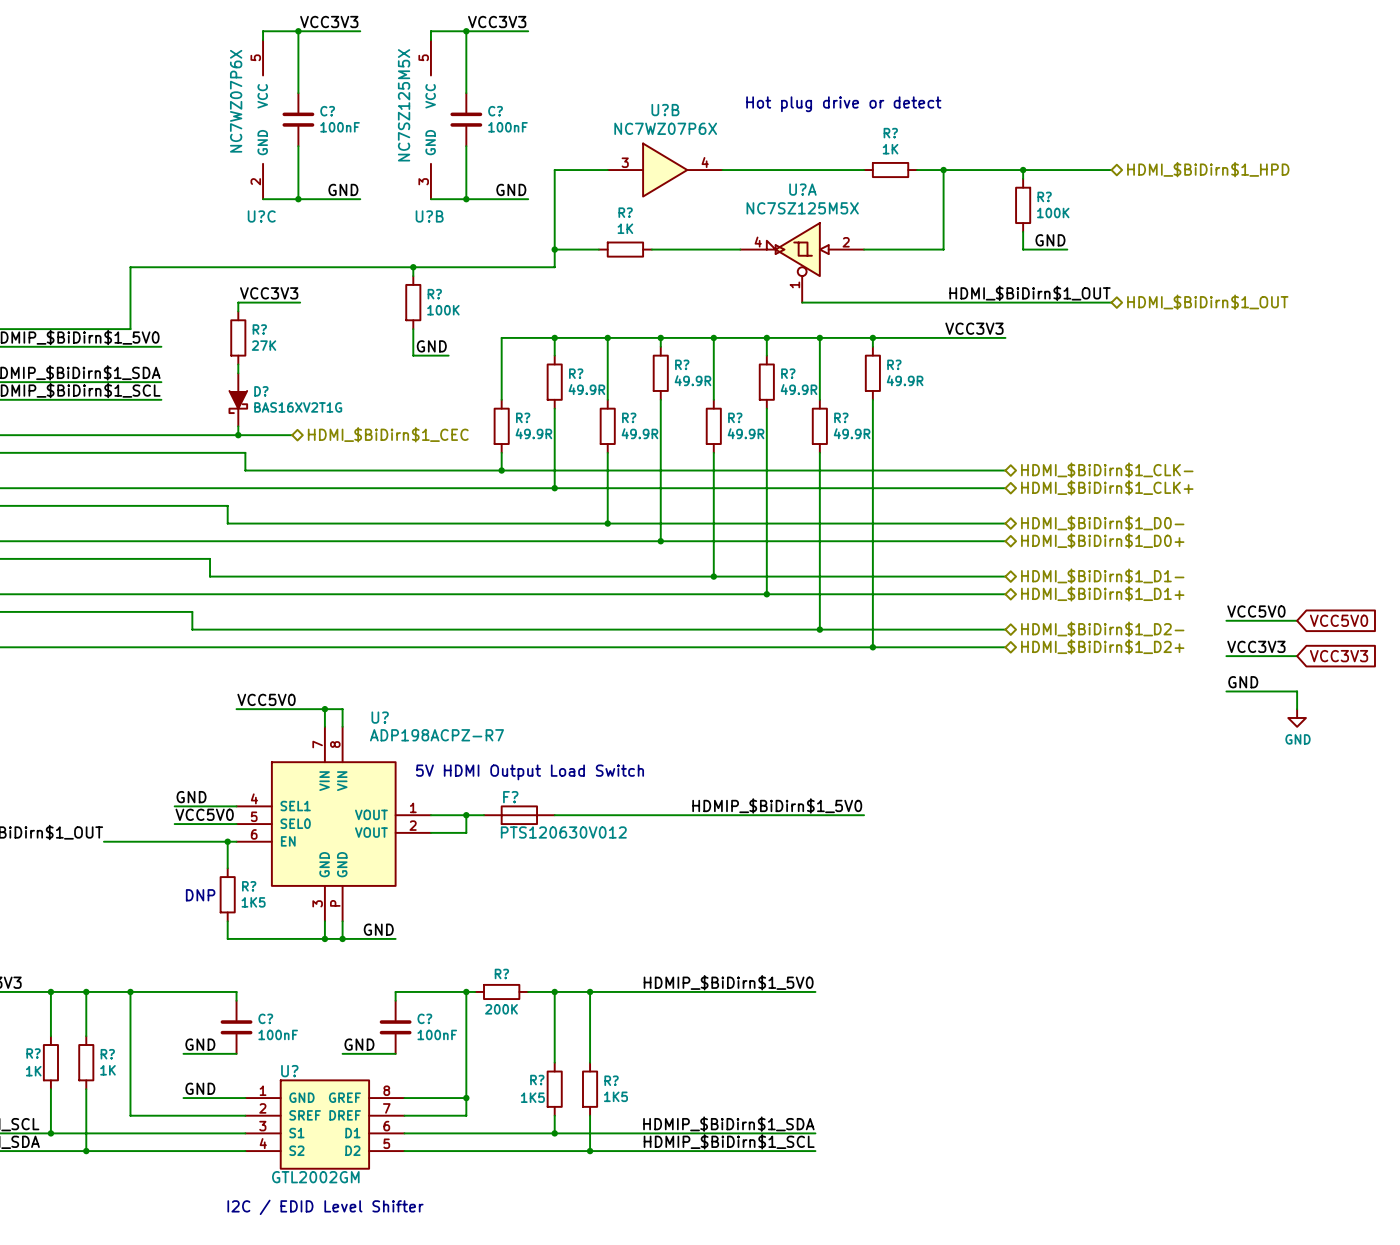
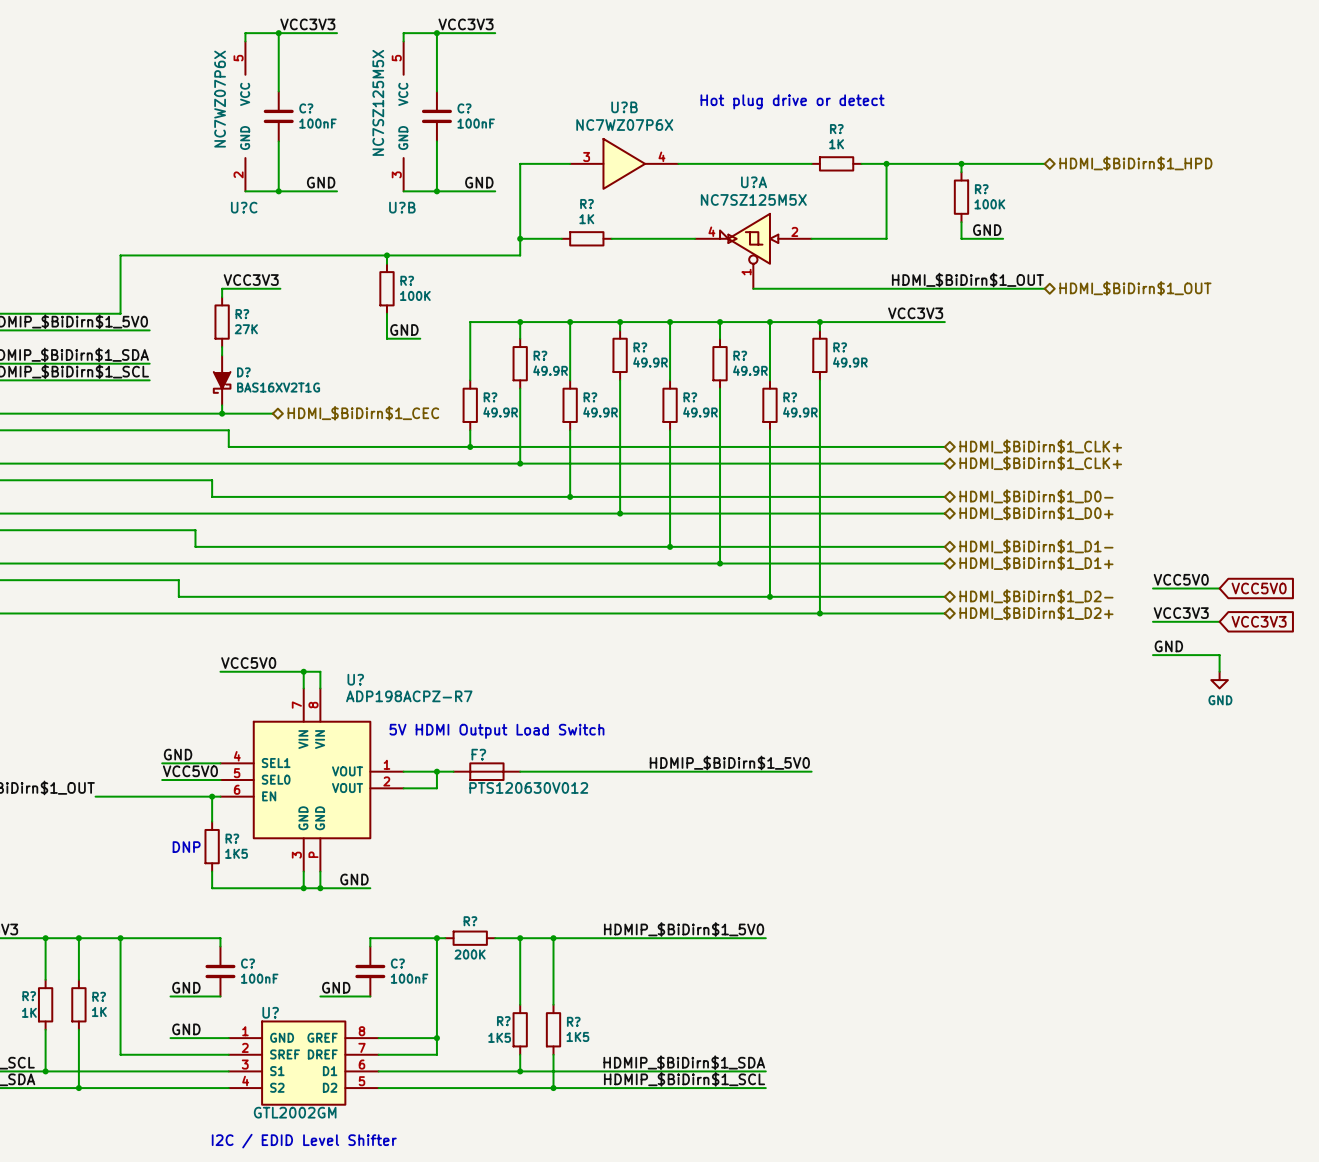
hierarchical label: HDMI_$BiDirn$1_CLK- (1107, 470) -> HDMI_$BiDirn$1_CLK+ (1040, 446)

